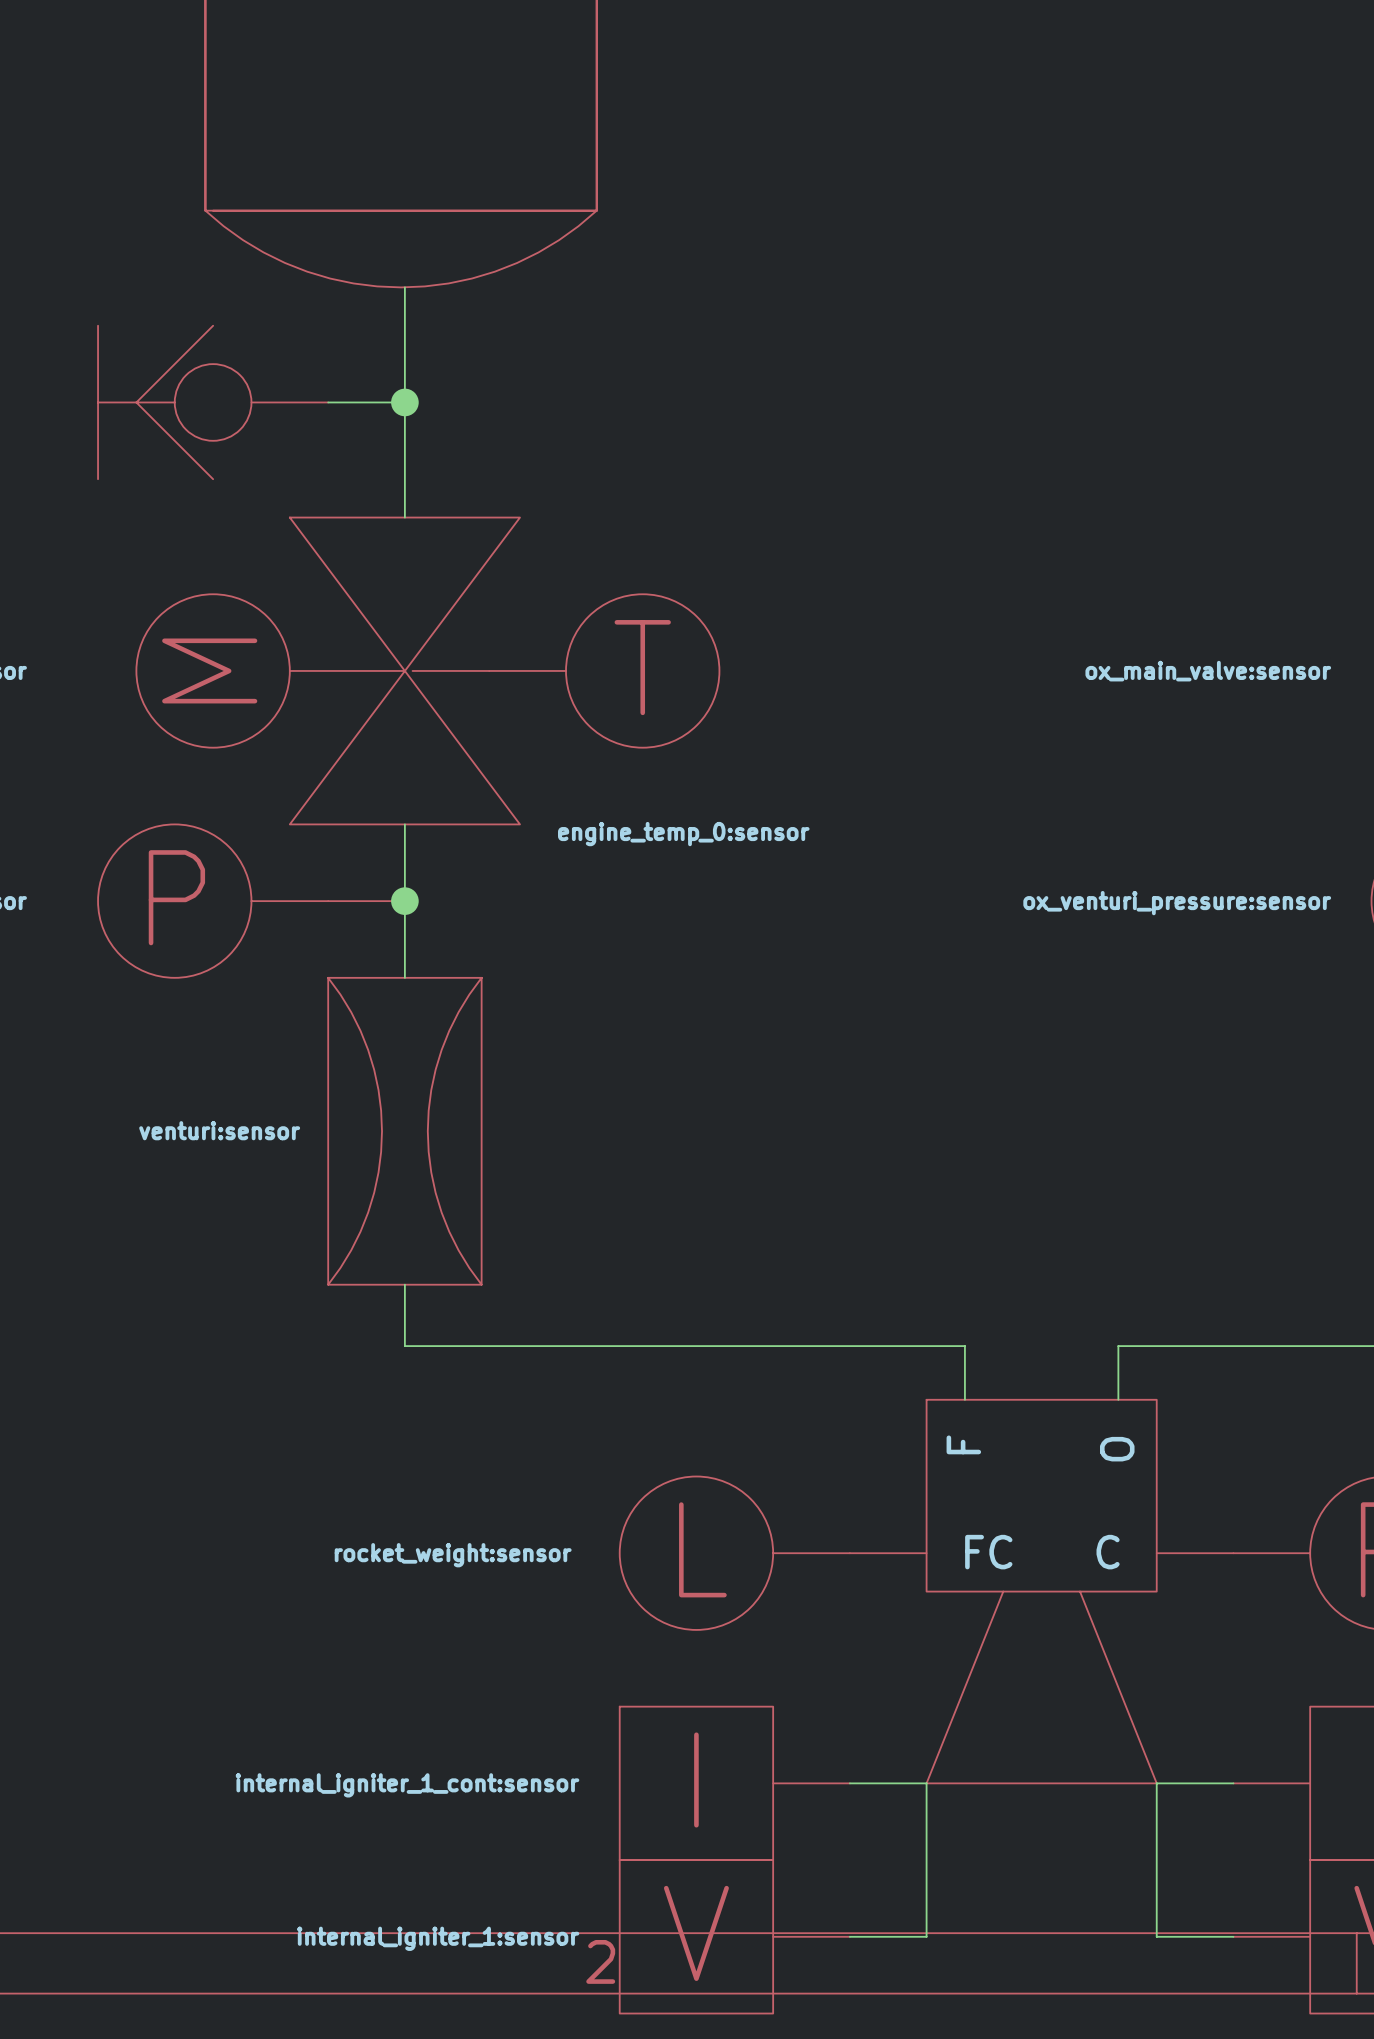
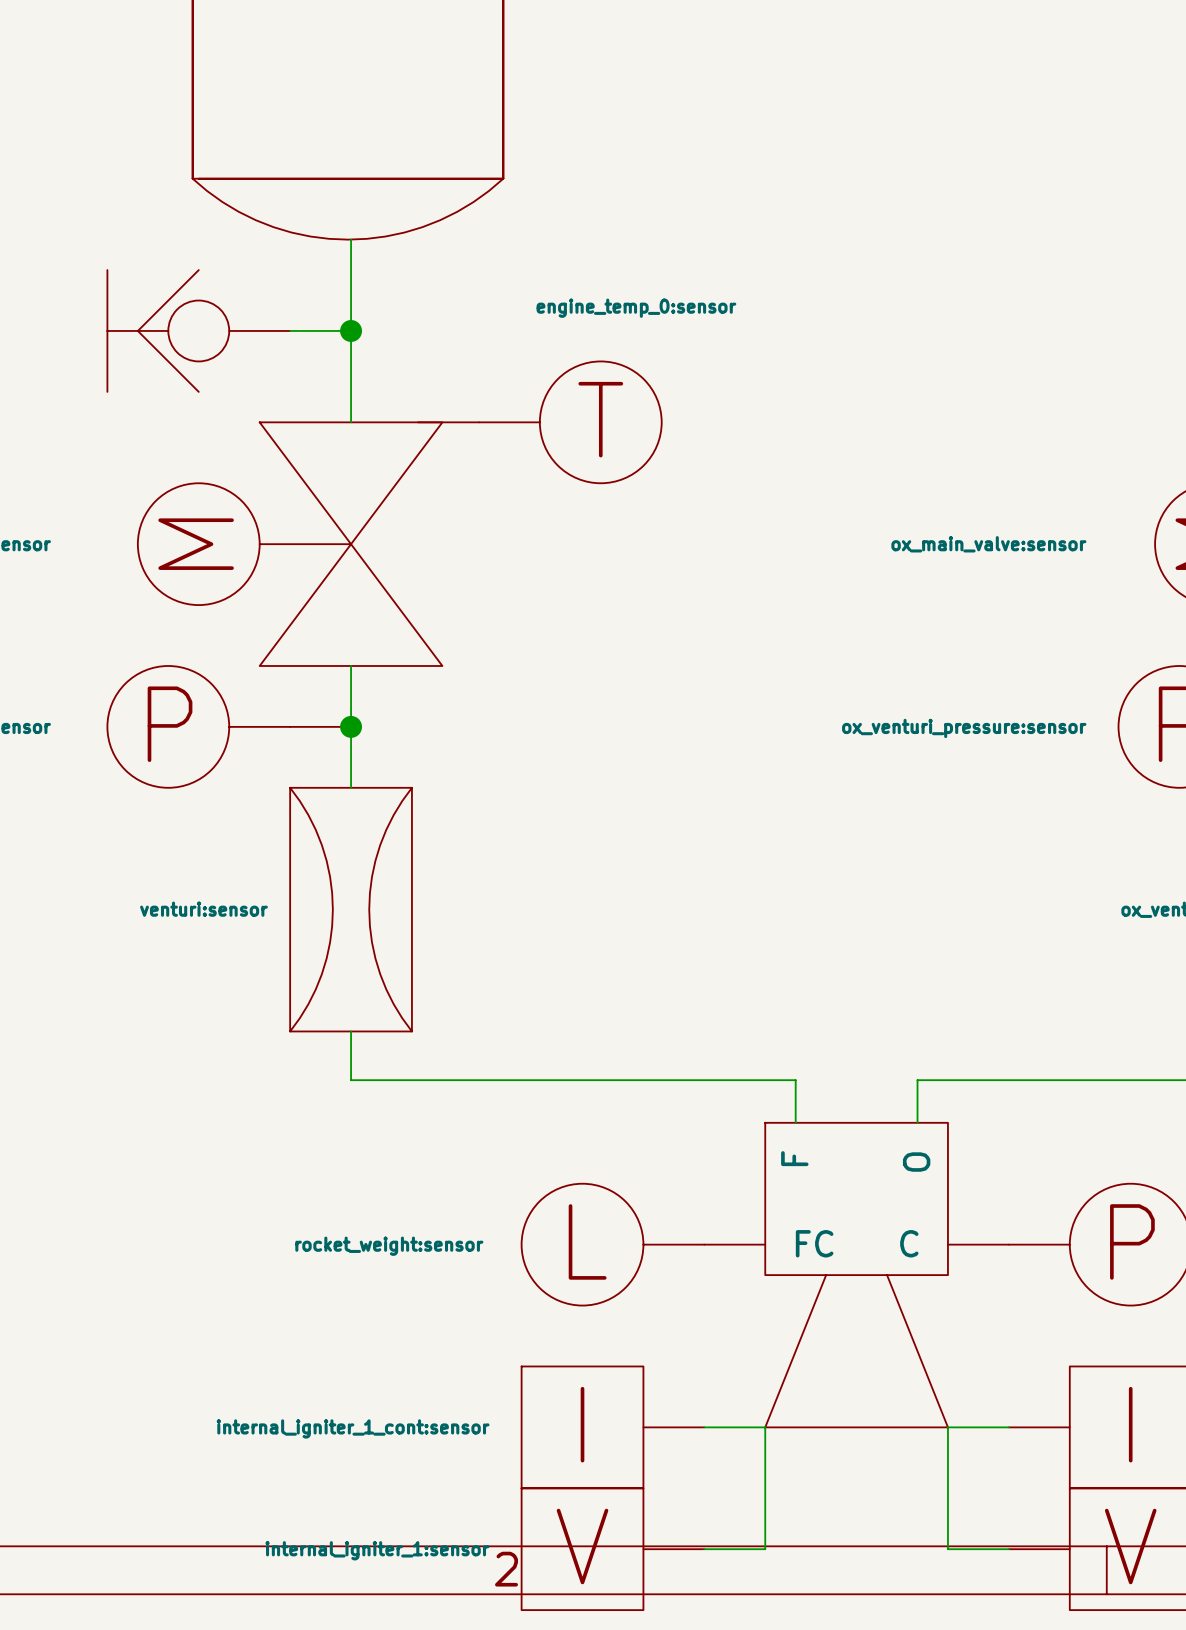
part position: (566, 670) -> (539, 422)
part value position: engine_temp_0:sensor (683, 834) -> engine_temp_0:sensor (636, 308)

